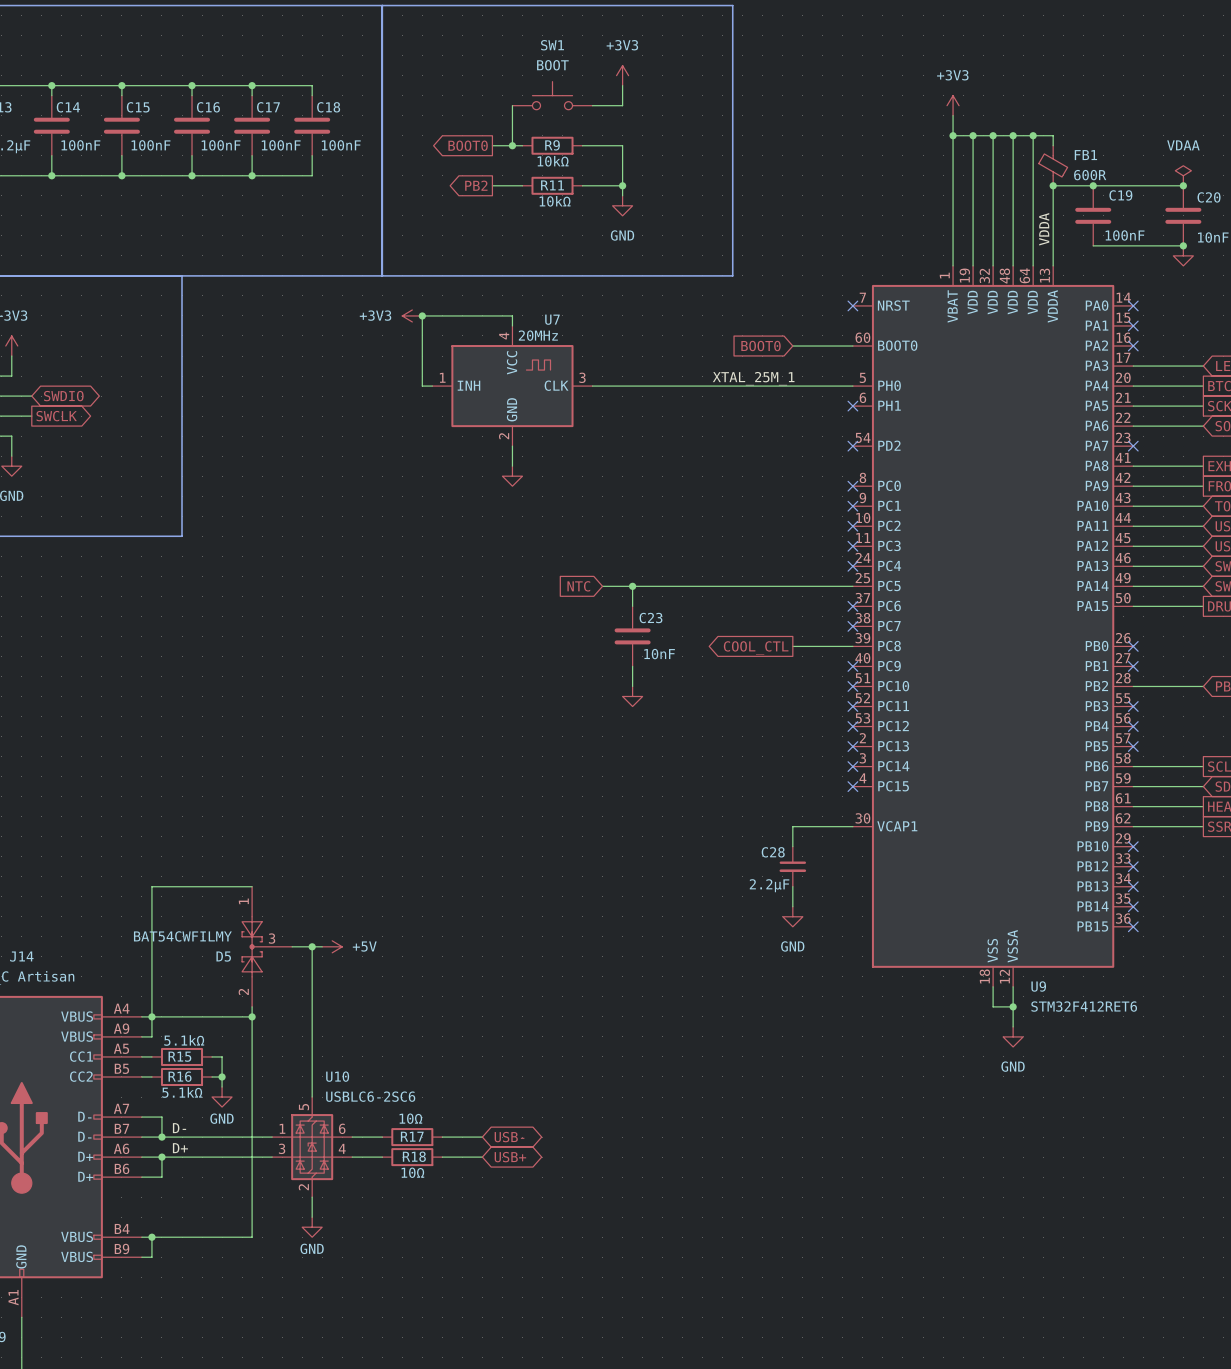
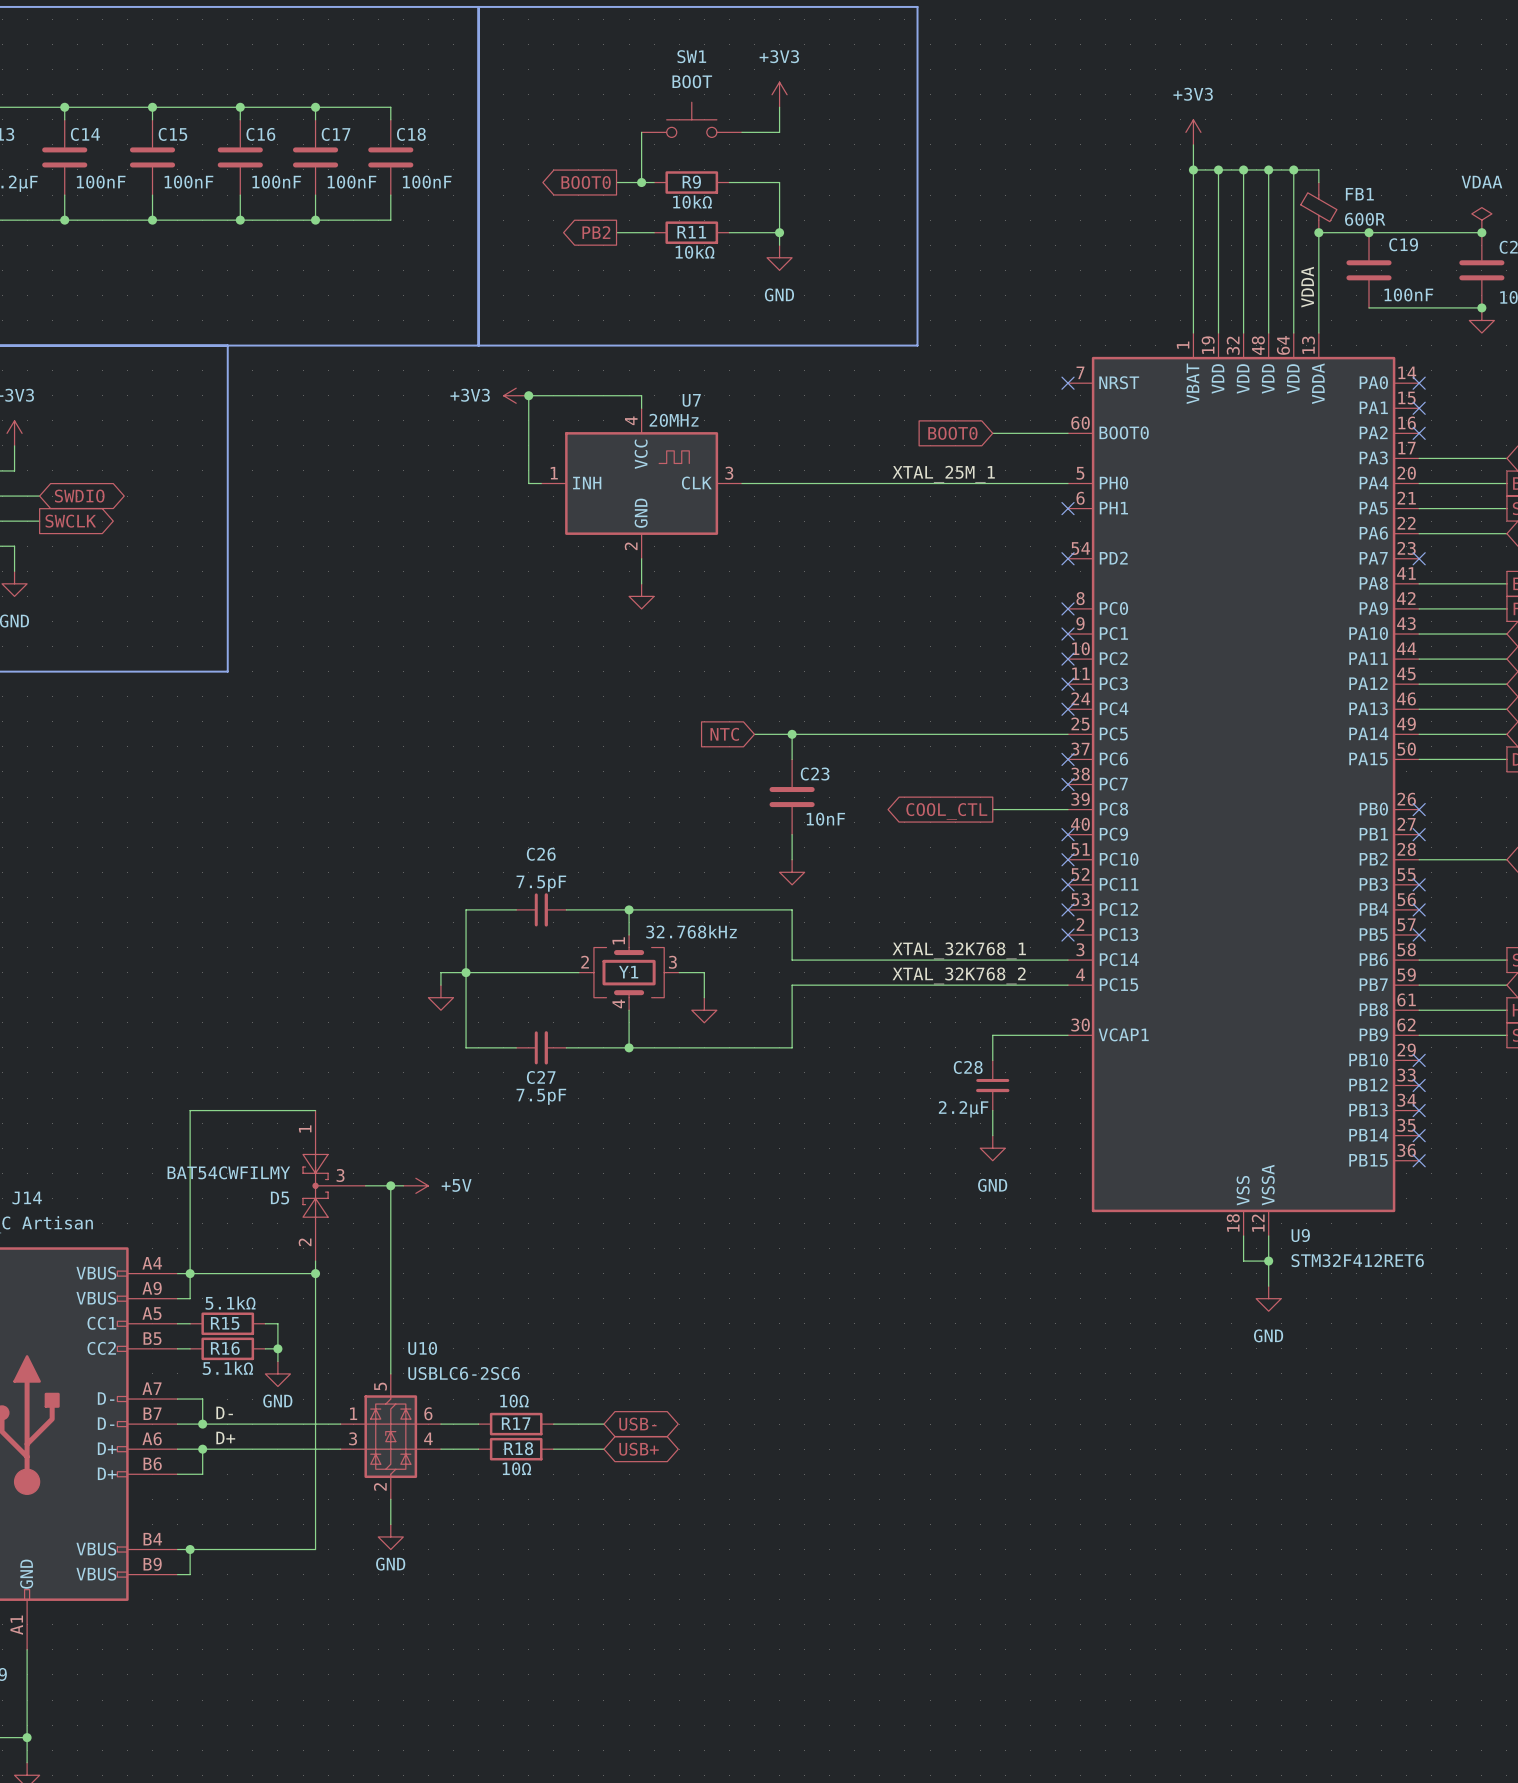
wire: none -> (516, 909) (466, 909) (466, 1047) (516, 1047)
C26: none -> 7.5pF (541, 909)
wire: none -> (566, 909) (792, 909) (792, 960) (1068, 960)
wire: none -> (629, 909) (629, 934)
junction: none -> (629, 909)
label: none -> XTAL_32K768_1 (959, 950)
no-connect mark: (852, 766) -> none
junction: none -> (466, 972)
wire: none -> (578, 972) (440, 972) (440, 985)
Y1: none -> 32.768kHz (629, 972)
wire: none -> (679, 972) (704, 972) (704, 997)
label: none -> XTAL_32K768_2 (959, 975)
wire: none -> (1068, 985) (792, 985) (792, 1047) (566, 1047)
no-connect mark: (852, 786) -> none
power symbol: none -> (440, 997)
wire: none -> (629, 1010) (629, 1047)
power symbol: none -> (704, 1010)
C27: none -> 7.5pF (541, 1047)
junction: none -> (629, 1047)

